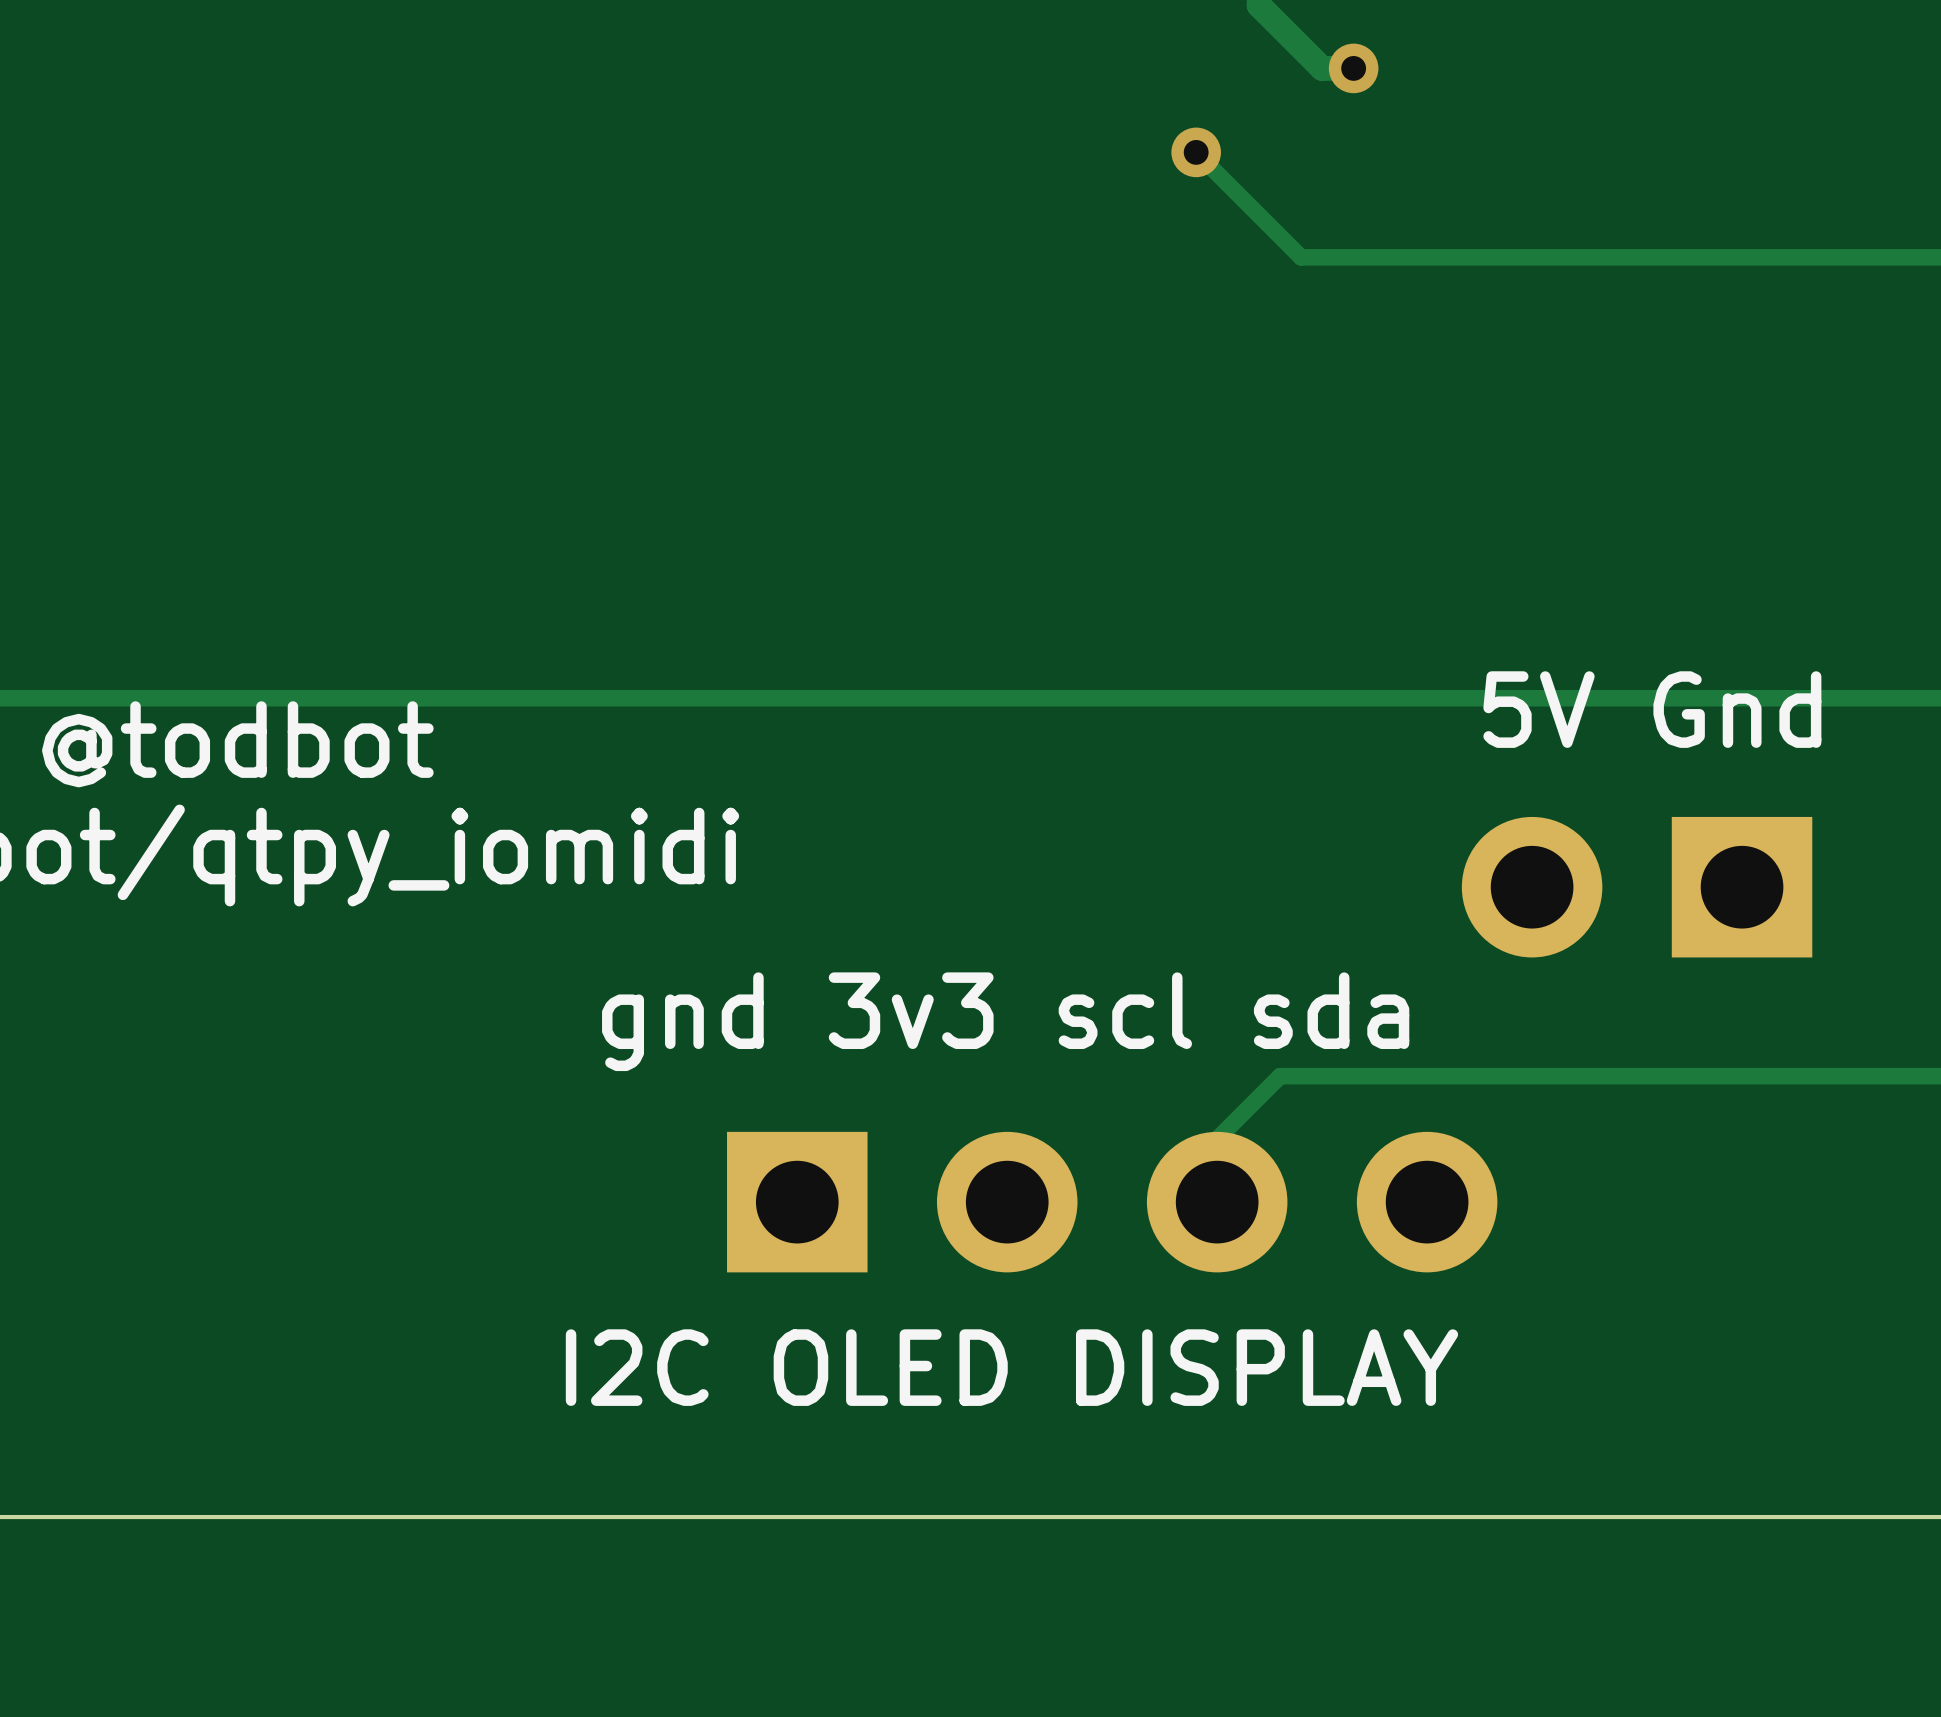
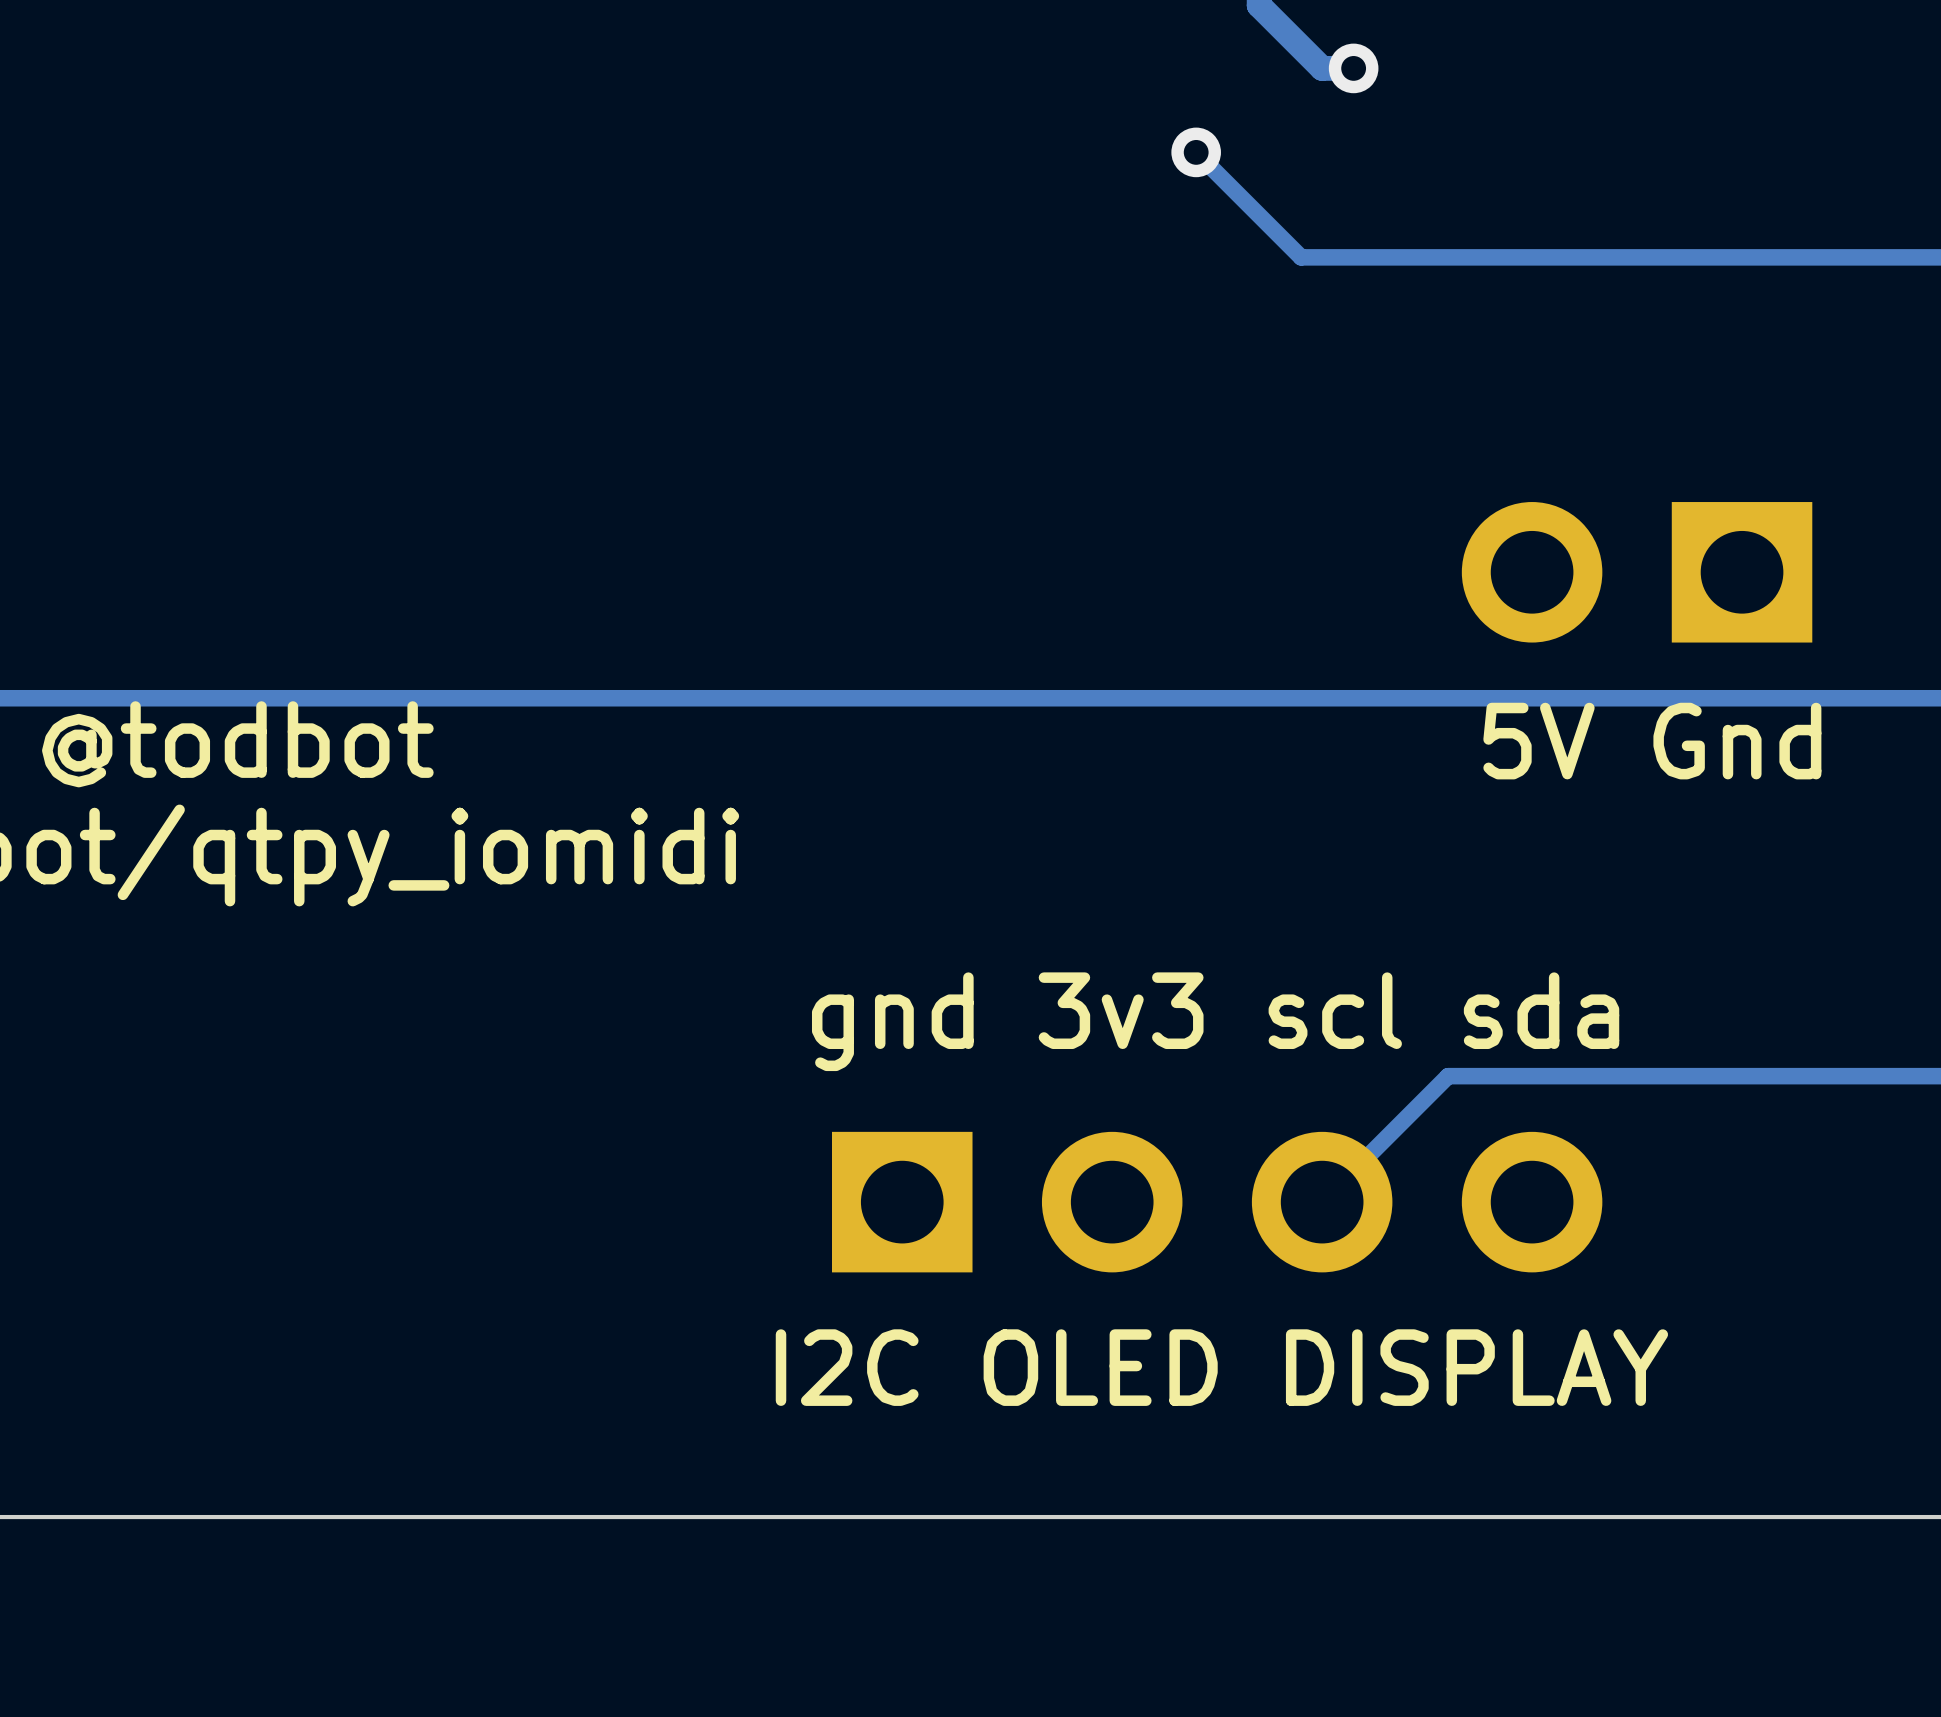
text position: 5V Gnd (1652, 709) -> 5V Gnd (1652, 741)
part position: (1637, 887) -> (1637, 572)
text position: gnd 3v3 scl sda (1005, 1021) -> gnd 3v3 scl sda (1215, 1021)
track: (1448, 1076) (1280, 1076) (1217, 1139) (1217, 1202) -> (1448, 1076) (1322, 1202)
part position: (1112, 1202) -> (1217, 1202)
text position: I2C OLED DISPLAY (1011, 1367) -> I2C OLED DISPLAY (1221, 1367)

